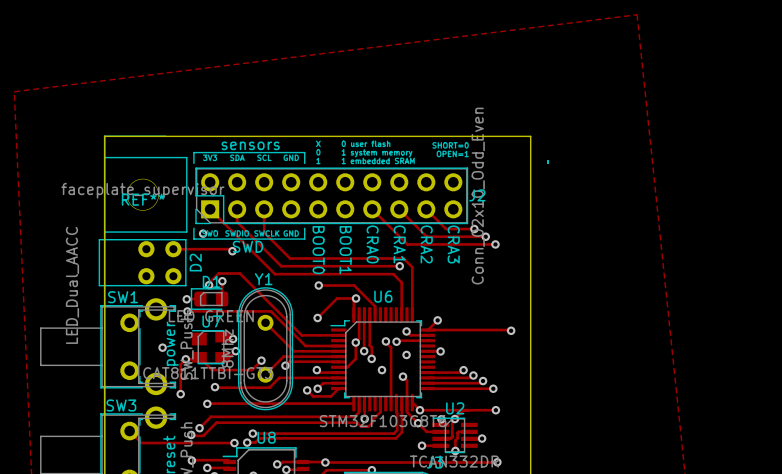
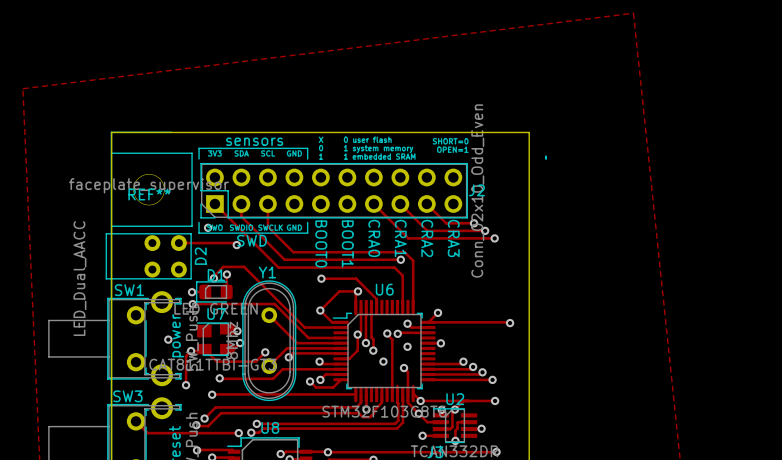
track: none -> (320, 310) (332, 322) (341, 322)

